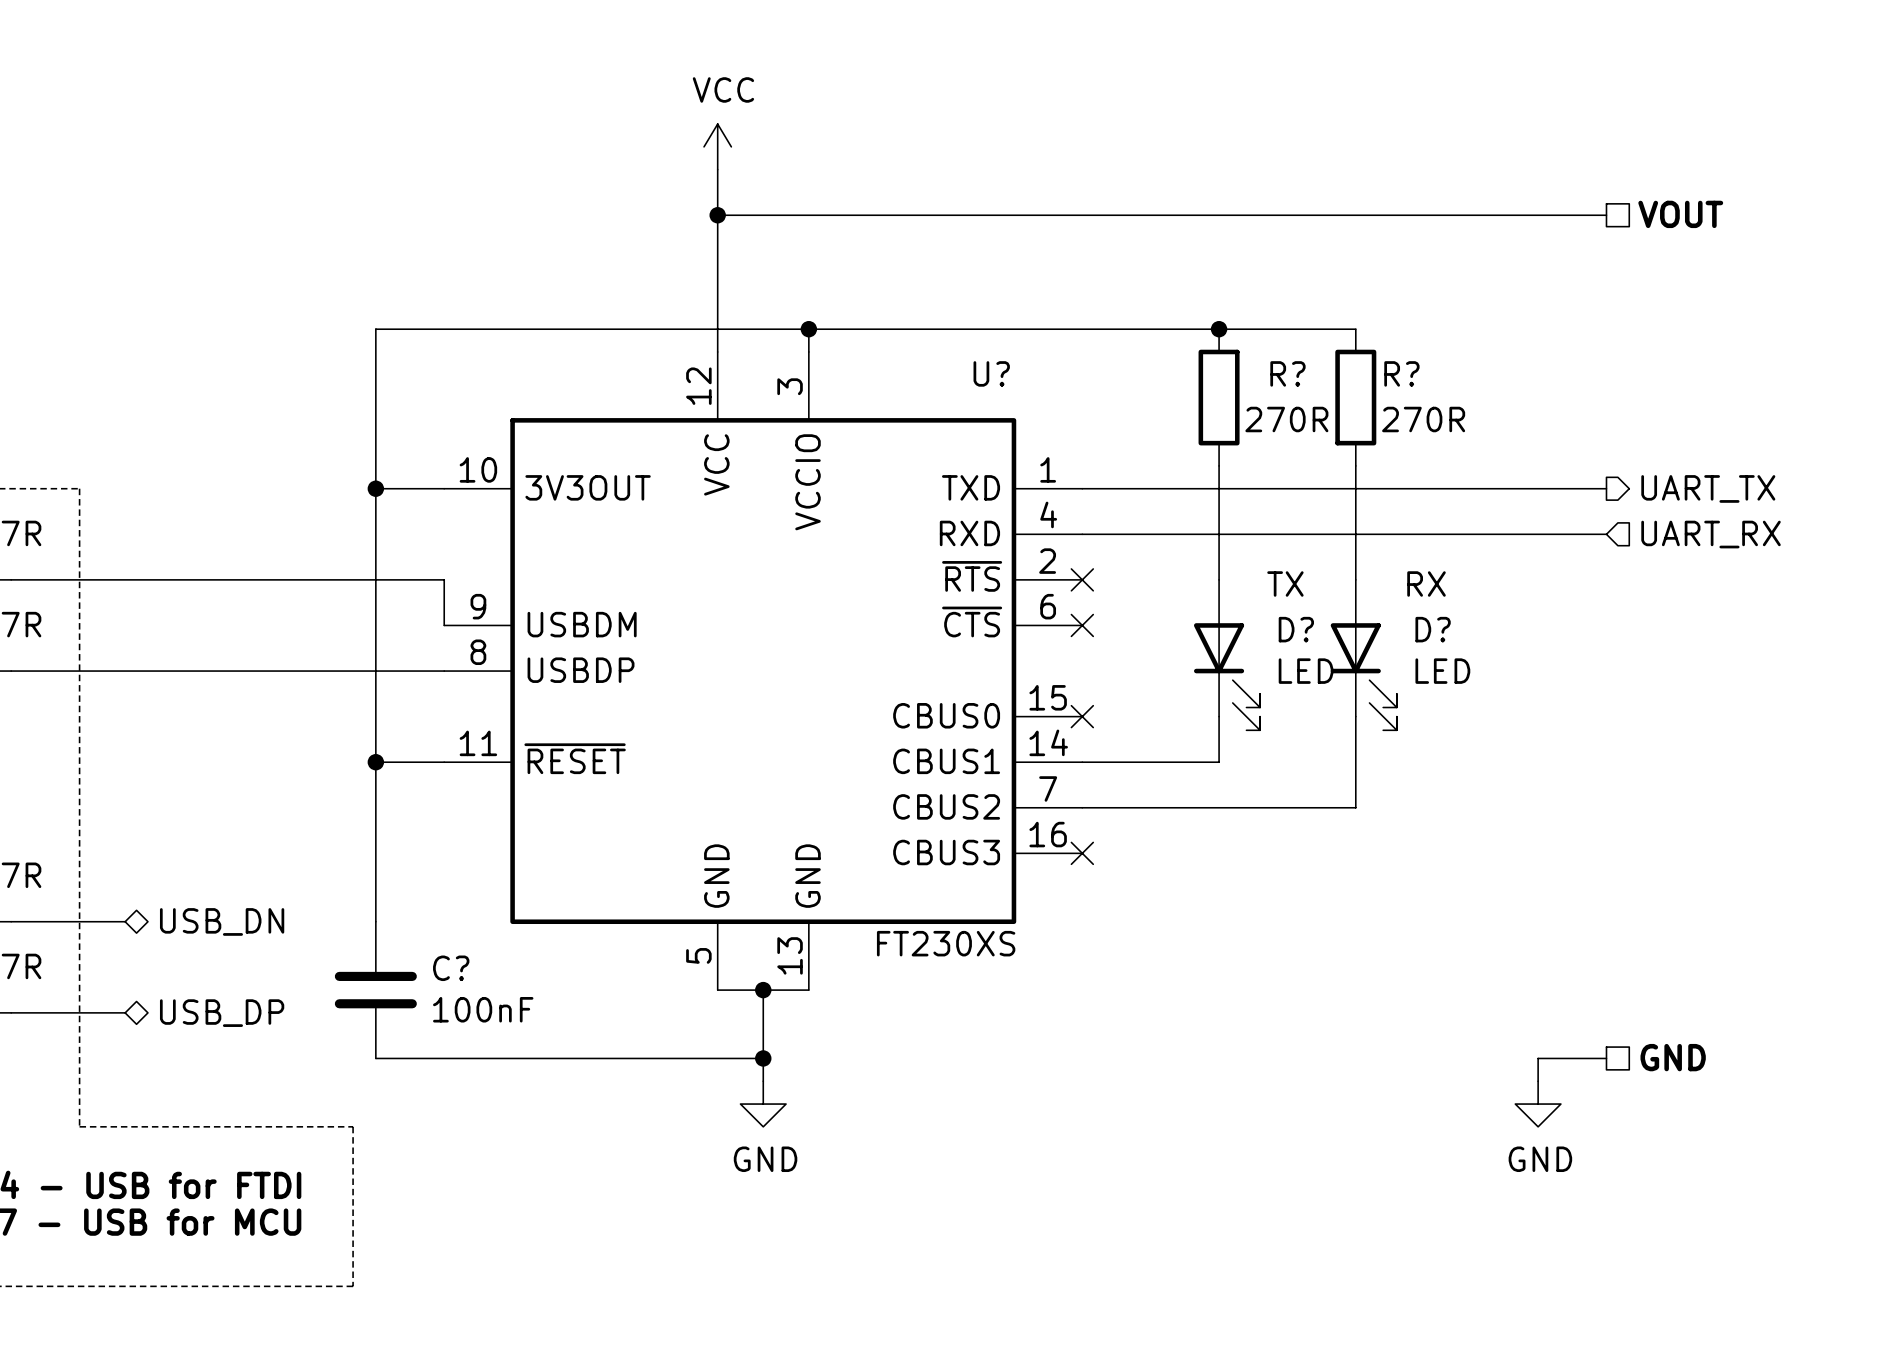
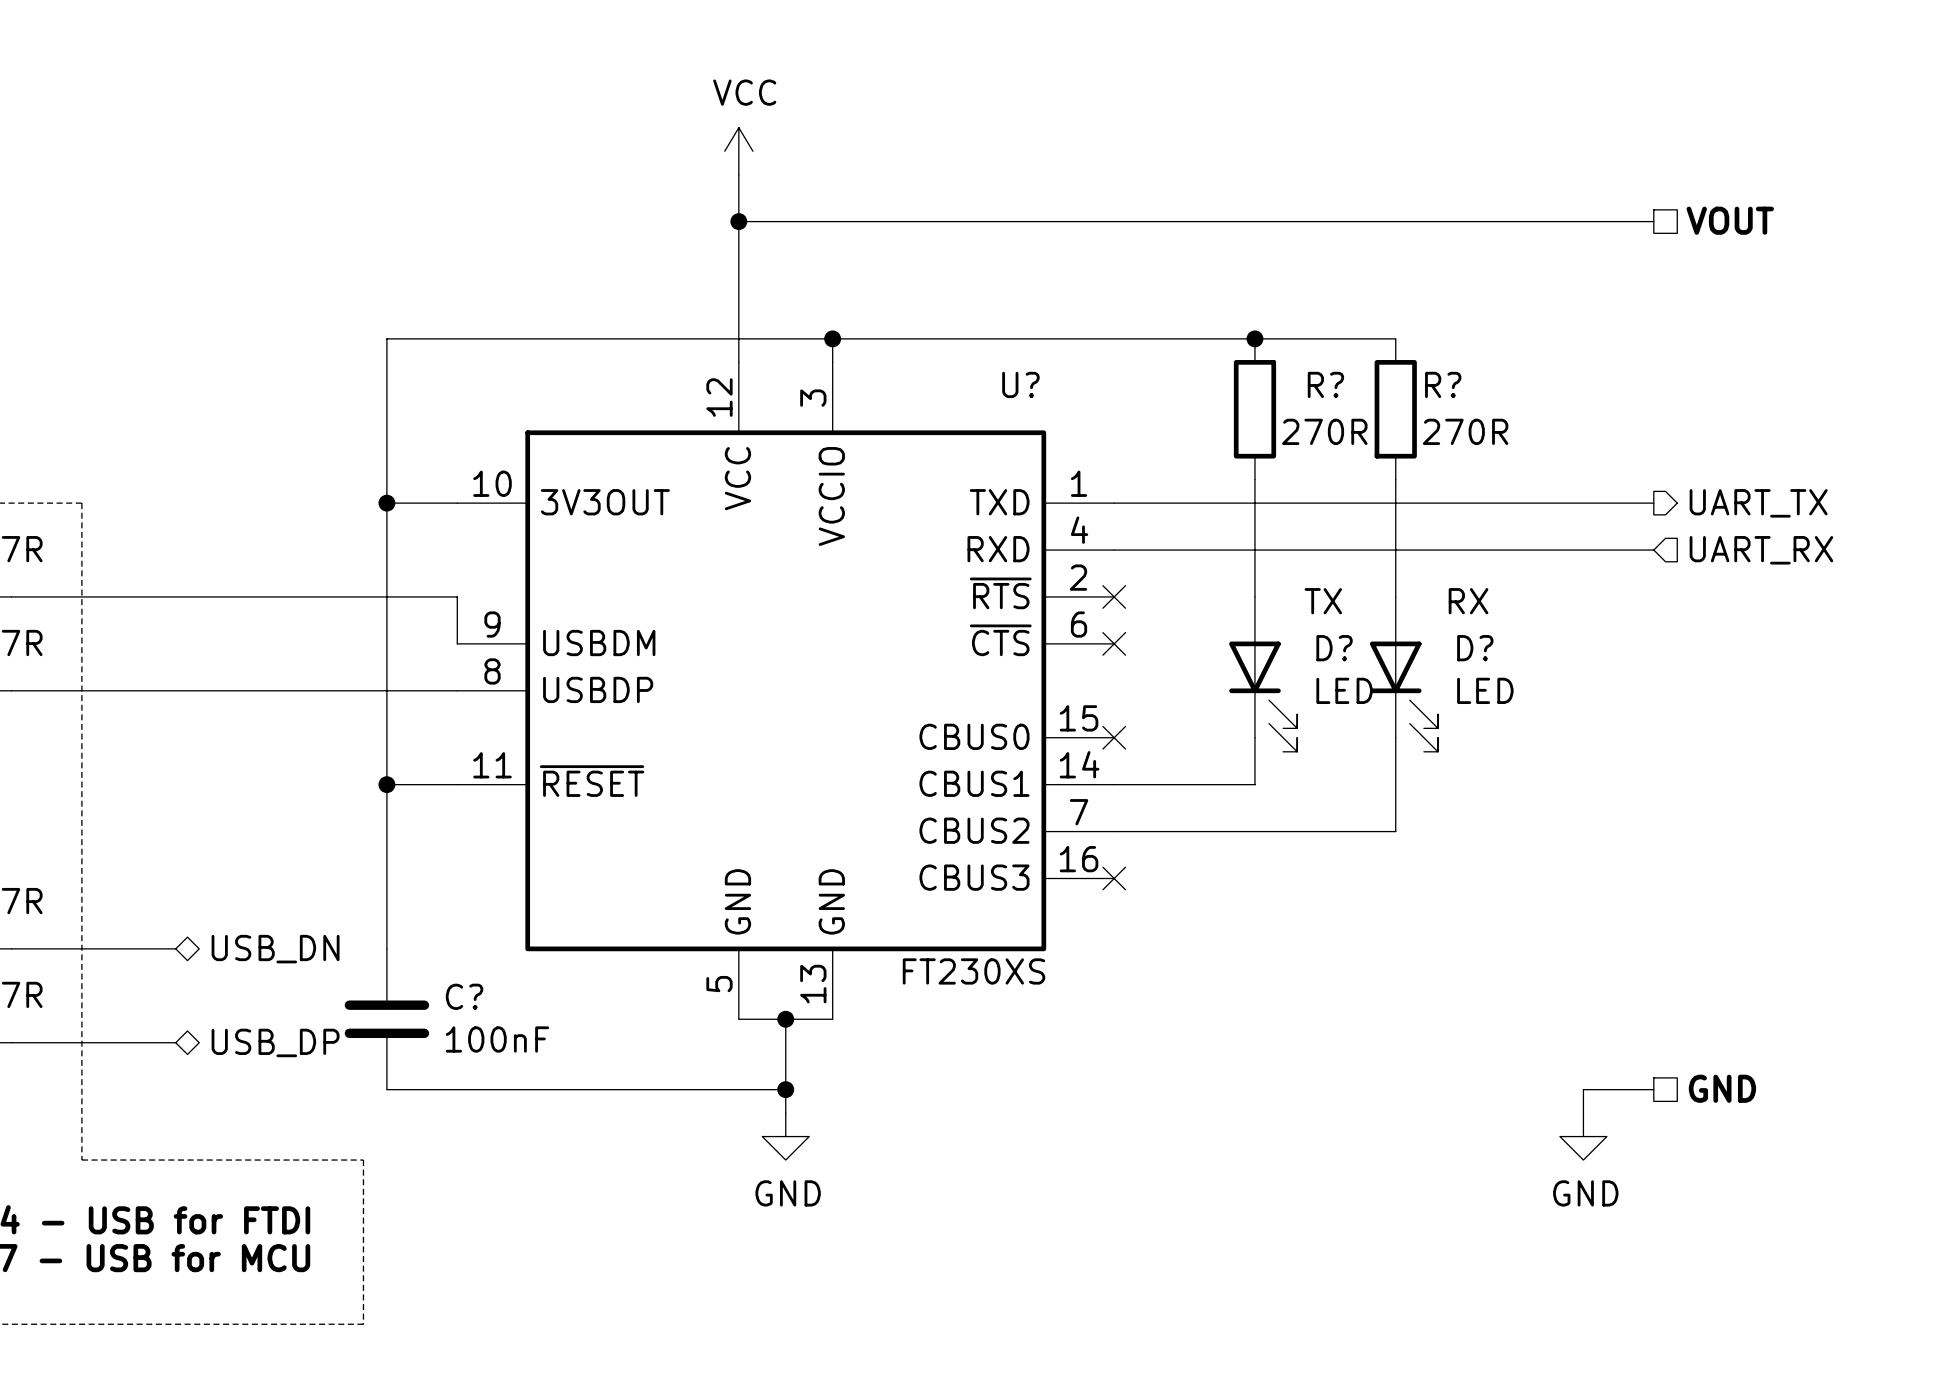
wire: none -> (128, 948) (175, 948)
hierarchical label position: USB_DN (222, 921) -> USB_DN (275, 949)
wire: none -> (128, 1042) (175, 1042)
hierarchical label position: USB_DP (222, 1013) -> USB_DP (275, 1042)

